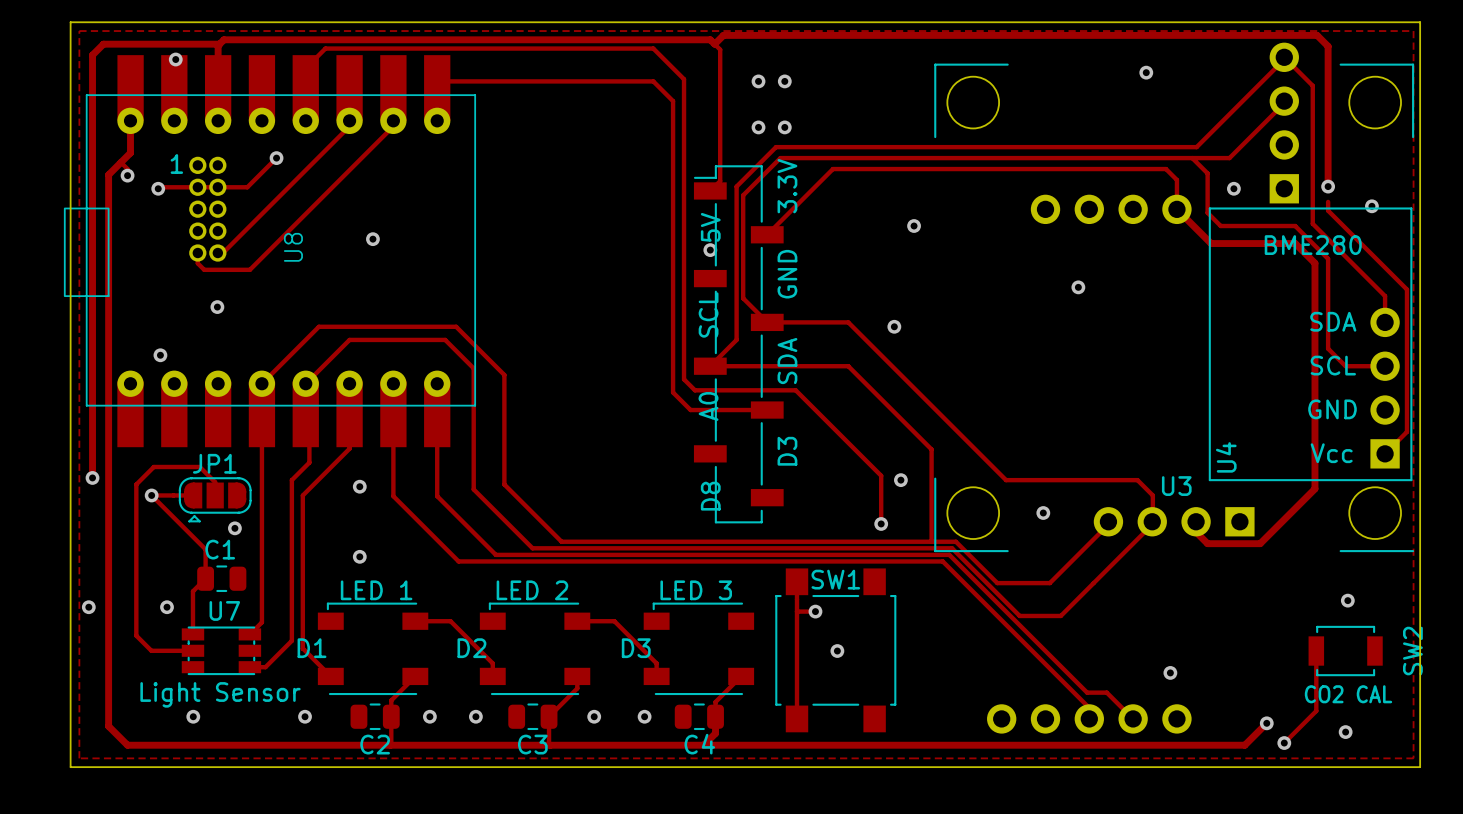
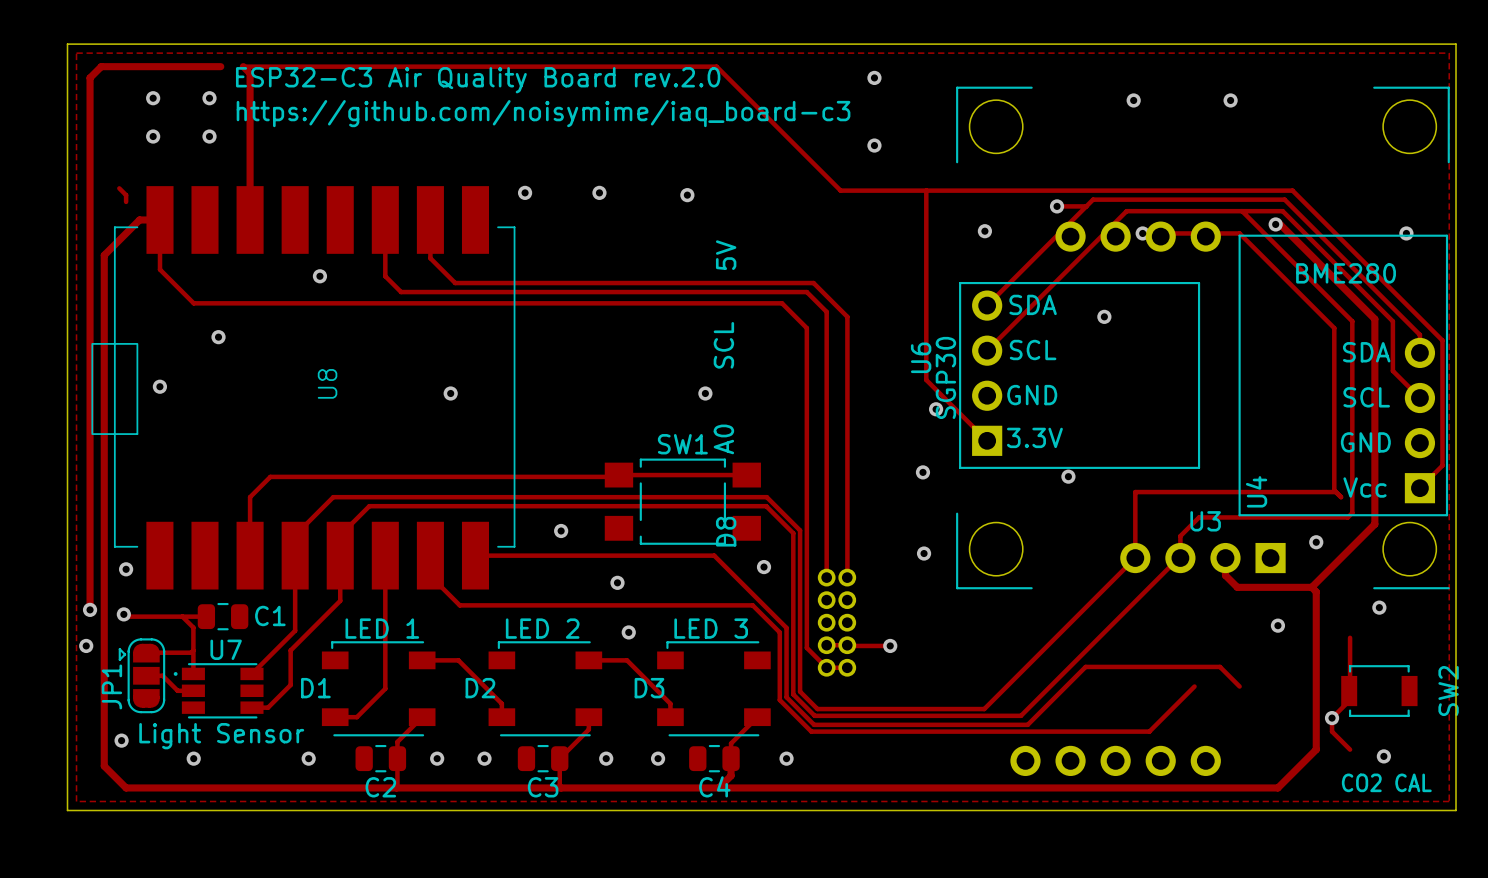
track: (714, 44) (720, 49) (720, 181) (710, 190) -> none
track: (714, 44) (710, 39) (223, 39) (218, 45) (218, 88) -> none
track: (714, 44) (723, 35) (1317, 35) (1328, 46) (1328, 186) -> none
U8 footprint: [63, 55, 477, 448] -> [91, 186, 516, 590]
via: none -> (874, 77)
text: none -> ESP32-C3 Air Quality Board rev.2.0 (478, 80)
via: (175, 59) -> none
via: (1146, 72) -> none
via: none -> (153, 98)
via: none -> (209, 98)
via: none -> (1133, 100)
via: none -> (1230, 100)
via: (758, 81) -> none
via: (784, 81) -> none
track: (305, 88) (305, 68) (325, 48) (653, 48) (684, 79) (684, 379) (694, 390) (795, 390) (881, 475) (881, 523) -> none
track: (437, 88) (443, 81) (653, 81) (673, 101) (673, 392) (690, 410) (767, 410) -> none
text: none -> https://github.com/noisymime/iaq_board-c3 (543, 113)
track: (1284, 101) (1284, 103) (1229, 158) (780, 158) (743, 195) (743, 298) (767, 322) (848, 322) (1006, 480) (1137, 480) (1152, 495) (1152, 523) (1060, 615) (1019, 615) (952, 548) (532, 548) (473, 489) (473, 368) (445, 339) (349, 339) (305, 383) -> none
via: none -> (153, 136)
via: none -> (209, 136)
track: (130, 120) (130, 152) (108, 174) (108, 726) -> (847, 667) (826, 667) (806, 647) (806, 328) (782, 303) (193, 303) (160, 269) (160, 219) (139, 219) (104, 255) (104, 766) (106, 768)
track: (349, 120) (349, 126) (222, 253) (217, 253) -> none
track: (393, 120) (393, 126) (249, 269) (204, 269) (197, 263) (197, 253) -> none
via: none -> (874, 145)
U6 side: bottom (1284, 123) -> top (1079, 375)
via: (758, 127) -> none
via: (784, 127) -> none
track: (276, 158) (247, 187) (158, 188) -> none
via: (276, 158) -> none
track: (1192, 158) (1207, 173) (1207, 212) (1220, 226) (1295, 226) (1328, 258) (1328, 348) (1345, 366) (1385, 366) -> (987, 350) (1126, 211) (1282, 211) (1392, 321) (1392, 370) (1419, 398)
text: 1 (176, 164) -> none
track: none -> (926, 190) (926, 379) (987, 440)
via: none -> (525, 192)
via: none -> (599, 192)
via: none -> (687, 195)
via: (127, 175) -> none
track: none -> (1057, 206) (1086, 206)
via: none -> (1057, 206)
track: none -> (1242, 211) (1352, 321) (1352, 512) (1347, 517) (1199, 517) (1180, 536) (1180, 556) (1020, 715) (814, 715) (793, 694) (793, 533) (766, 506) (369, 506) (340, 535) (340, 600) (290, 650) (290, 685)
text: 3.3V (787, 186) -> none
via: (1328, 186) -> none
via: (158, 188) -> none
via position: (1233, 188) -> (1275, 224)
track: none -> (385, 219) (385, 276) (401, 292) (806, 292) (826, 311) (826, 577)
track: none -> (430, 219) (430, 258) (455, 283) (813, 283) (847, 316) (847, 577)
track: (1328, 201) (1328, 210) (1406, 289) (1406, 310) -> (250, 219) (250, 73) (243, 66) (716, 66) (840, 190) (1292, 190) (1442, 340)
track: none -> (1142, 233) (1239, 233) (1334, 328) (1334, 490) (1341, 497)
via: none -> (1142, 233)
part: (207, 209) -> none
via position: (914, 226) -> (984, 231)
track: (767, 234) (832, 169) (1166, 169) (1176, 180) (1176, 209) (1211, 243) (1295, 243) -> (1275, 224) (1280, 224) (1327, 271)
via: (372, 239) -> none
via: none -> (319, 276)
via: (710, 250) -> none
track: (1314, 263) (1314, 488) (1260, 543) (1207, 543) (1196, 532) -> (1347, 292) (1374, 319) (1374, 524) (1311, 587)
text: GND (787, 274) -> none
track: (1385, 304) (1385, 296) (1312, 223) (1312, 85) (1284, 57) (1284, 59) (1196, 147) (776, 147) (736, 186) (736, 339) (710, 366) (848, 366) (931, 449) (931, 541) -> (1419, 334) (1284, 199) (1093, 199) (987, 305)
via: (894, 326) -> none
part: (738, 344) -> none
via: none -> (450, 393)
via: none -> (705, 393)
text: SDA (787, 361) -> none
via: none -> (936, 409)
track: (261, 383) (318, 326) (456, 326) (504, 374) (504, 484) (561, 541) (955, 541) (997, 583) (1049, 583) (1108, 524) (1108, 521) -> none
track: (261, 414) (261, 622) -> none
track: (305, 414) (309, 417) (309, 462) (291, 480) (291, 499) -> (1335, 492) (1135, 492) (1135, 558) (984, 709) (817, 709) (800, 691) (800, 530) (766, 497) (333, 497) (295, 535)
track: (349, 414) (349, 448) (302, 495) (302, 648) (330, 676) -> (385, 555) (385, 688) (356, 717) (335, 717)
track: (393, 414) (393, 496) (458, 561) (942, 561) (1089, 707) (1089, 718) -> none
track: (437, 414) (437, 496) (495, 554) (949, 554) (1087, 692) (1106, 692) (1133, 718) -> none
via: none -> (922, 472)
track: none -> (746, 475) (270, 476) (250, 497) (250, 555)
via: none -> (1068, 476)
text: D3 (787, 451) -> none
JP1 name position: JP1 (214, 463) -> JP1 (111, 686)
track: none -> (90, 512) (90, 609)
via: (92, 477) -> none
via: (900, 480) -> none
via: (359, 486) -> none
via: (151, 495) -> none
track: (192, 495) (151, 495) (205, 549) (205, 578) (192, 591) -> (182, 616) (193, 629)
track: (215, 495) (215, 482) (199, 466) (153, 466) (136, 484) (136, 635) (151, 650) (177, 650) -> (146, 675) (162, 675) (177, 690)
via: none -> (561, 530)
JP1 rotation: 0° (215, 499) -> 90° clockwise (141, 675)
JP1 position: (215, 499) -> (141, 675)
via: none -> (1316, 542)
via: (1043, 513) -> none
via: none -> (924, 553)
track: none -> (430, 555) (430, 575) (459, 605) (752, 605) (779, 632) (779, 700) (811, 731) (1149, 731) (1194, 686)
track: none -> (475, 555) (714, 555) (786, 627) (786, 697) (814, 724) (1027, 724) (1085, 666) (1220, 666) (1239, 686)
via: (881, 523) -> none
via: (234, 528) -> none
via: none -> (764, 567)
via: none -> (126, 569)
track: none -> (1225, 568) (1225, 575) (1237, 587) (1311, 587)
via: none -> (617, 582)
C1 name position: C1 (220, 549) -> C1 (270, 615)
via: (359, 556) -> none
SW1 footprint: [775, 568, 897, 733] -> [604, 458, 761, 545]
via: none -> (90, 609)
track: none -> (123, 614) (126, 616) (206, 616)
via: none -> (123, 614)
track: (797, 581) (797, 718) -> none
part: none -> (836, 622)
via: none -> (1277, 625)
track: (291, 592) (291, 640) (287, 645) -> (295, 630) (264, 661)
via: none -> (628, 632)
track: none -> (1350, 637) (1349, 691)
via position: (1347, 600) -> (1379, 607)
track: none -> (826, 645) (890, 645)
via: (167, 607) -> none
via: none -> (890, 645)
track: none -> (193, 650) (191, 652) (146, 652)
track: (797, 611) (815, 611) -> none
via: (815, 611) -> none
U7 footprint: [181, 626, 262, 676] -> [173, 663, 264, 719]
via: (837, 651) -> none
track: (1316, 660) (1316, 711) (1284, 743) -> (1349, 700) (1332, 718) (1332, 731) (1350, 749)
via: (1170, 672) -> none
via: none -> (1332, 718)
text position: CO2 CAL (1348, 694) -> CO2 CAL (1386, 782)
via: none -> (121, 740)
via: none -> (786, 758)
track: (1266, 723) (1244, 745) -> (1311, 587) (1316, 591) (1316, 749) (1277, 787) (1275, 787)
via: (1266, 723) -> none
via position: (1345, 732) -> (1383, 756)
via: (1284, 743) -> none

